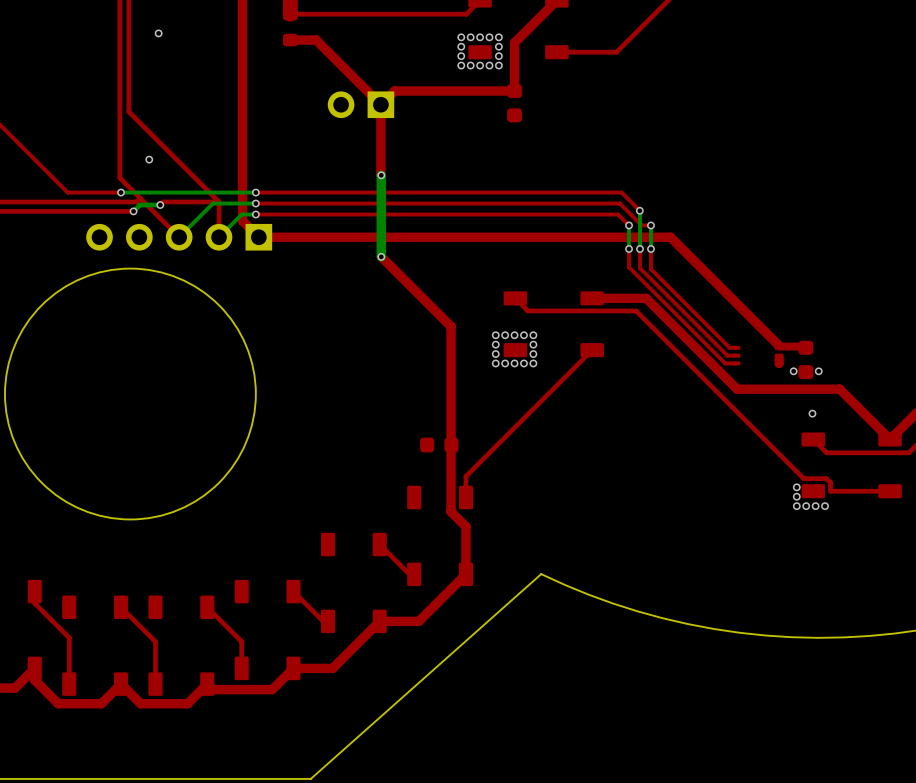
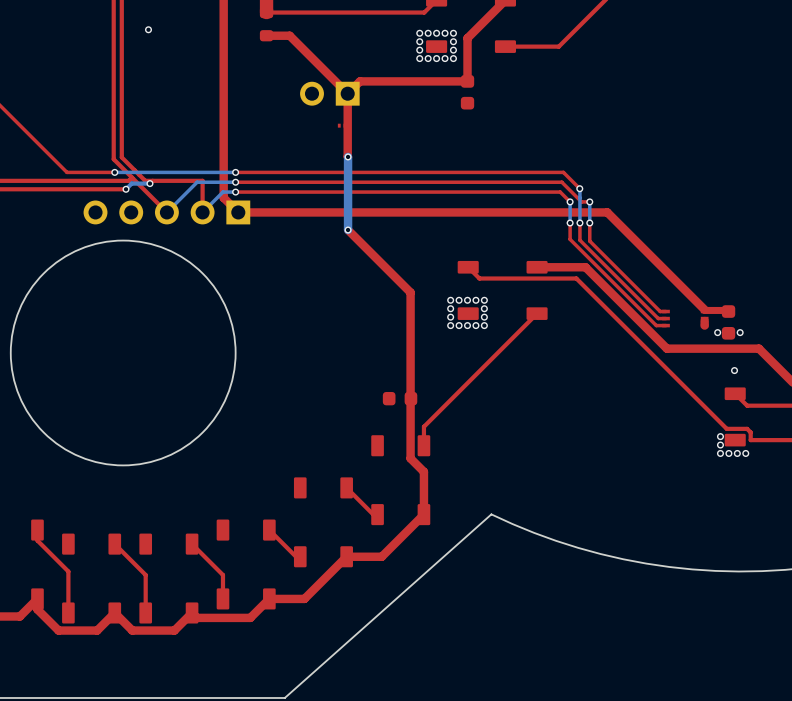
top track: (128, 111) (219, 201) -> (121, 100) (121, 157) (145, 180) (152, 180)
part: none -> (342, 125)
via: (149, 159) -> none

